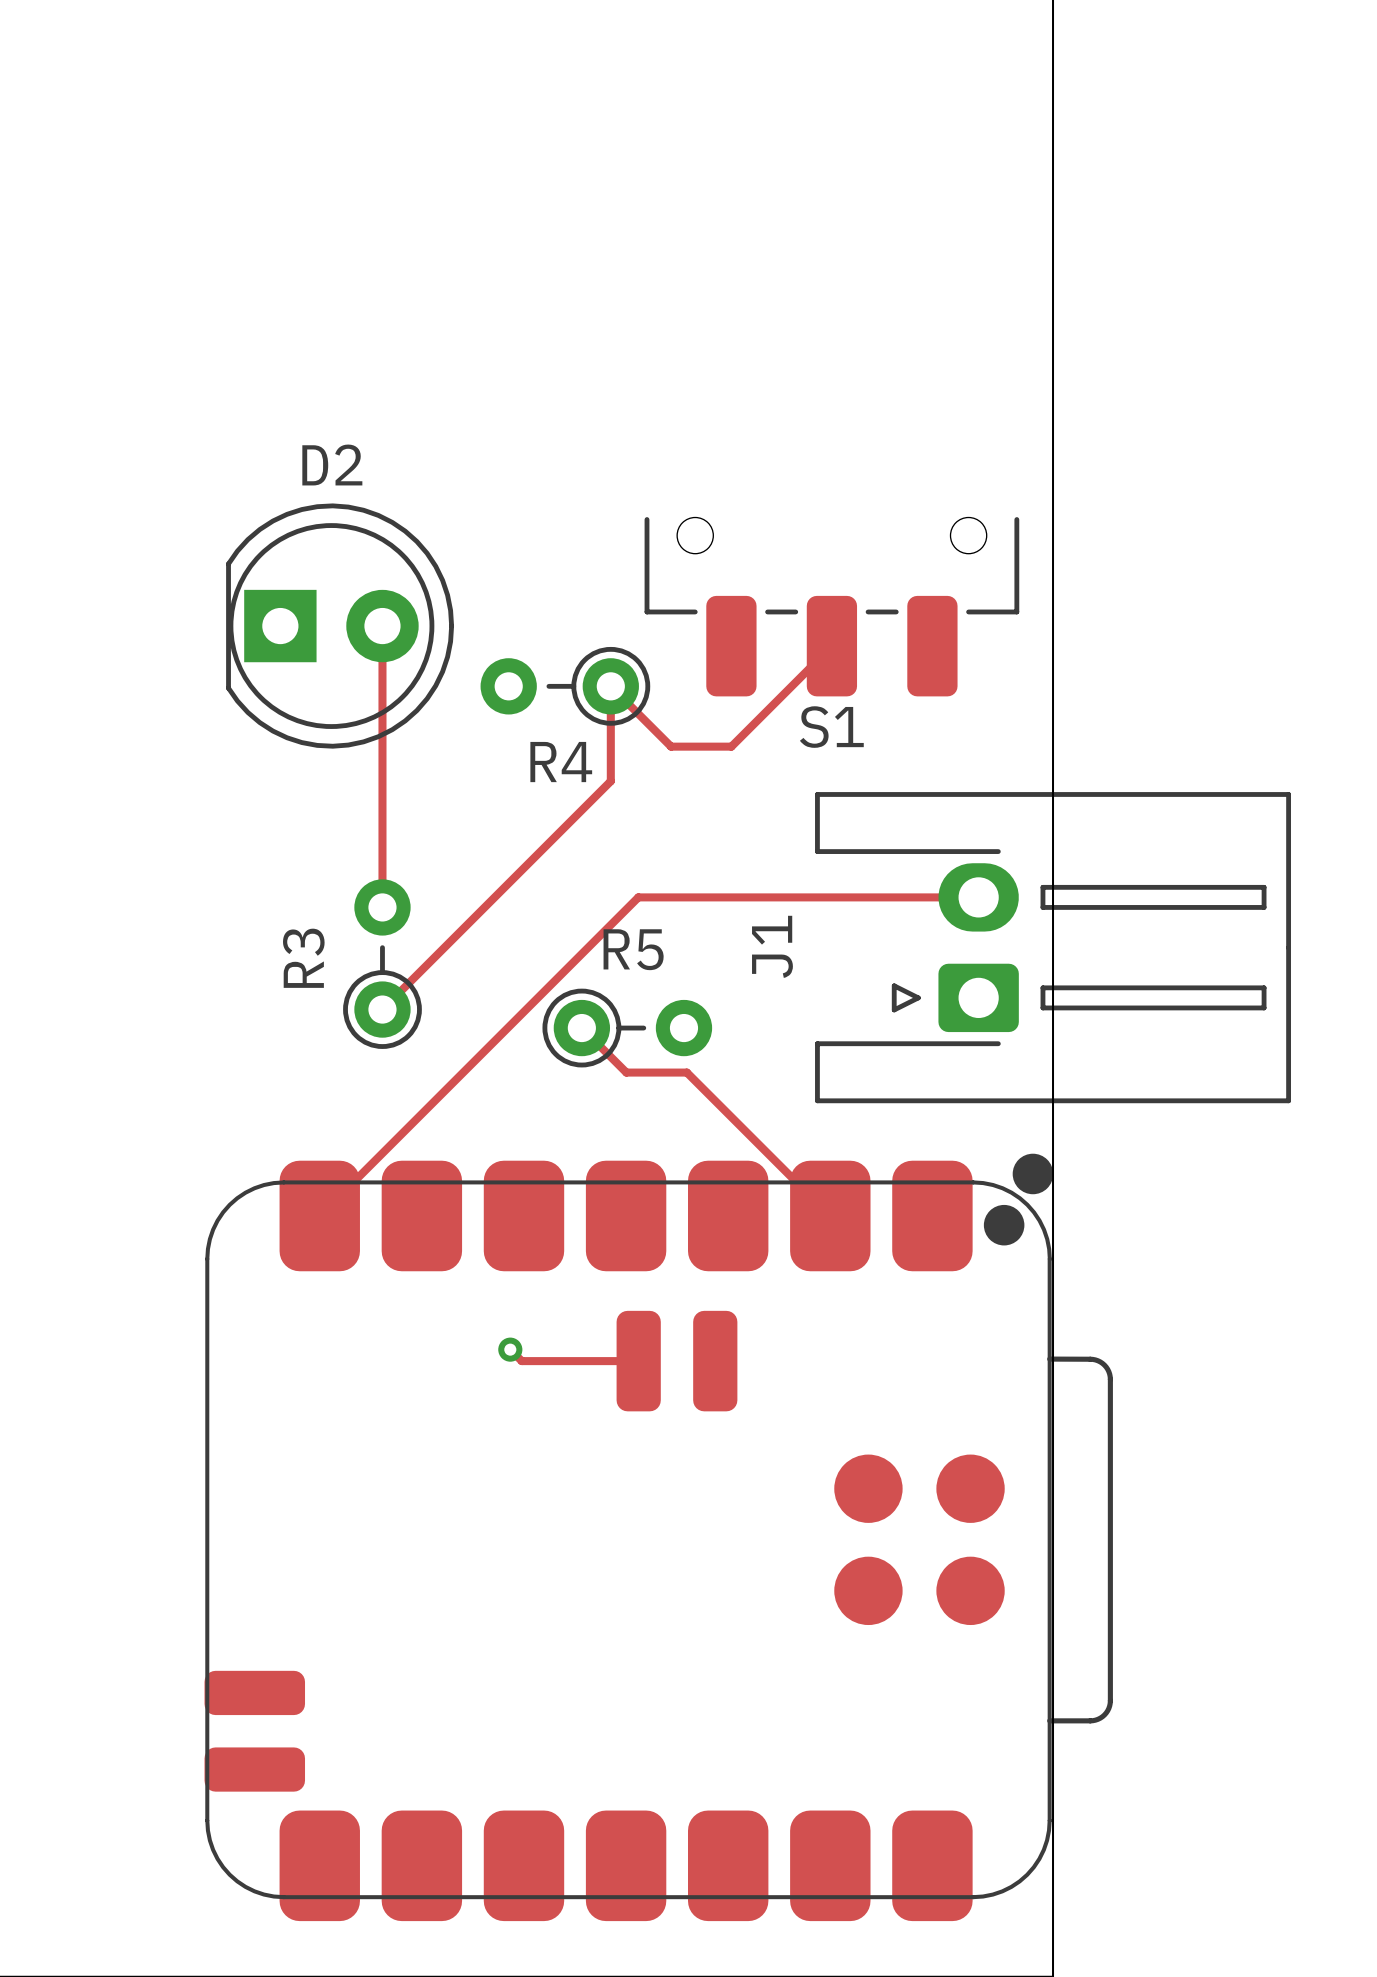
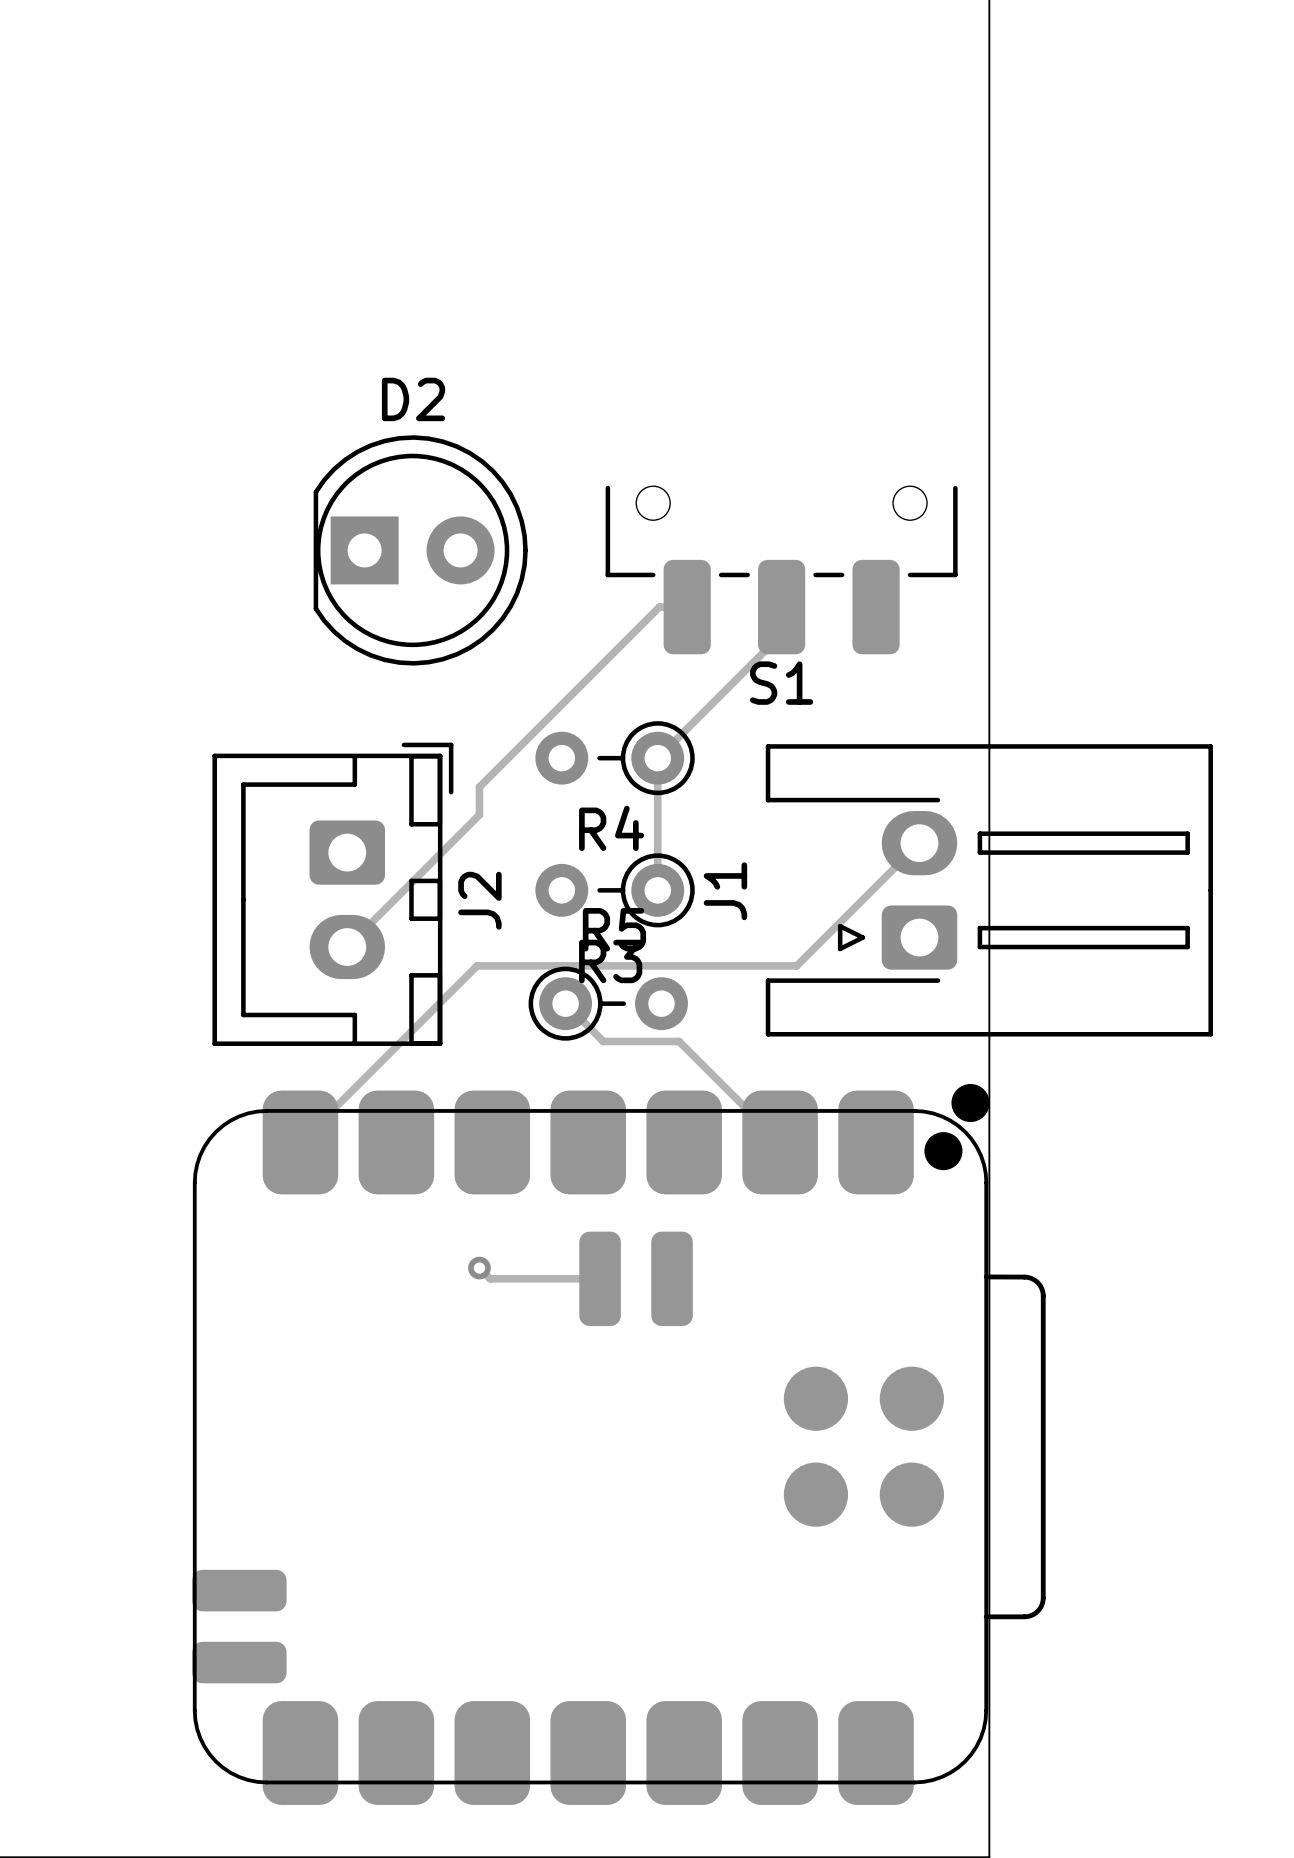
D2 position: (340, 626) -> (420, 550)
track: (382, 626) (382, 907) -> none
track: none -> (687, 607) (659, 607) (479, 787) (479, 814) (347, 947)
track: (831, 646) (731, 746) (671, 746) (610, 686) (610, 781) (382, 1009) -> (781, 607) (781, 634) (657, 758) (657, 890)
R4 position: (565, 686) -> (615, 758)
track: (978, 897) (638, 897) (507, 1028) -> (919, 843) (796, 965) (477, 965)
J2: none -> (332, 894)
R3 rotation: 0° (382, 964) -> 90° counterclockwise (615, 890)
R3 position: (382, 964) -> (615, 890)
track: (581, 1028) (626, 1072) (686, 1072) (722, 1108) -> (565, 1003) (603, 1041) (679, 1041)
R5 position: (627, 1028) -> (608, 1003)

